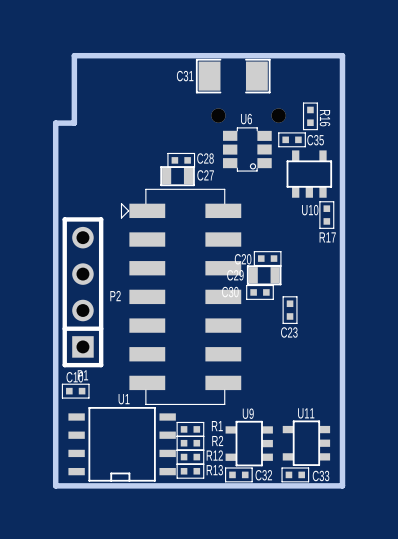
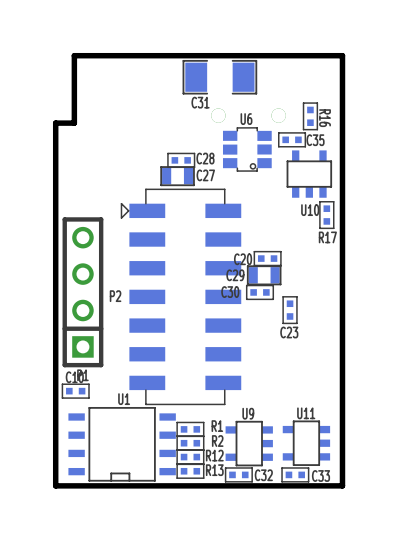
C31 name position: C31 (185, 76) -> C31 (200, 102)
C31 position: (233, 76) -> (219, 77)

